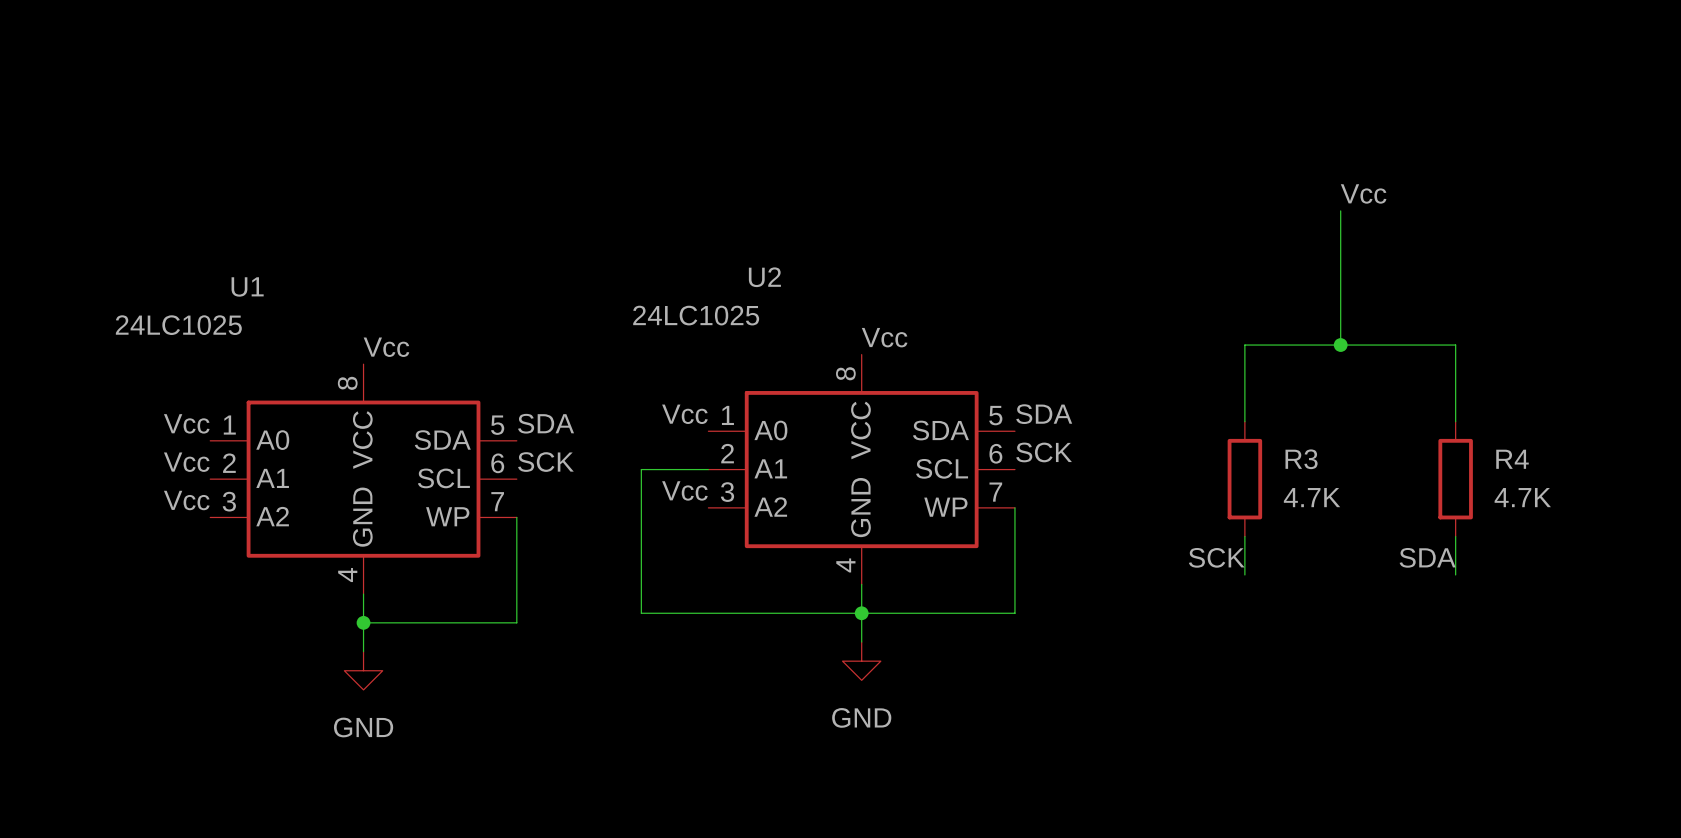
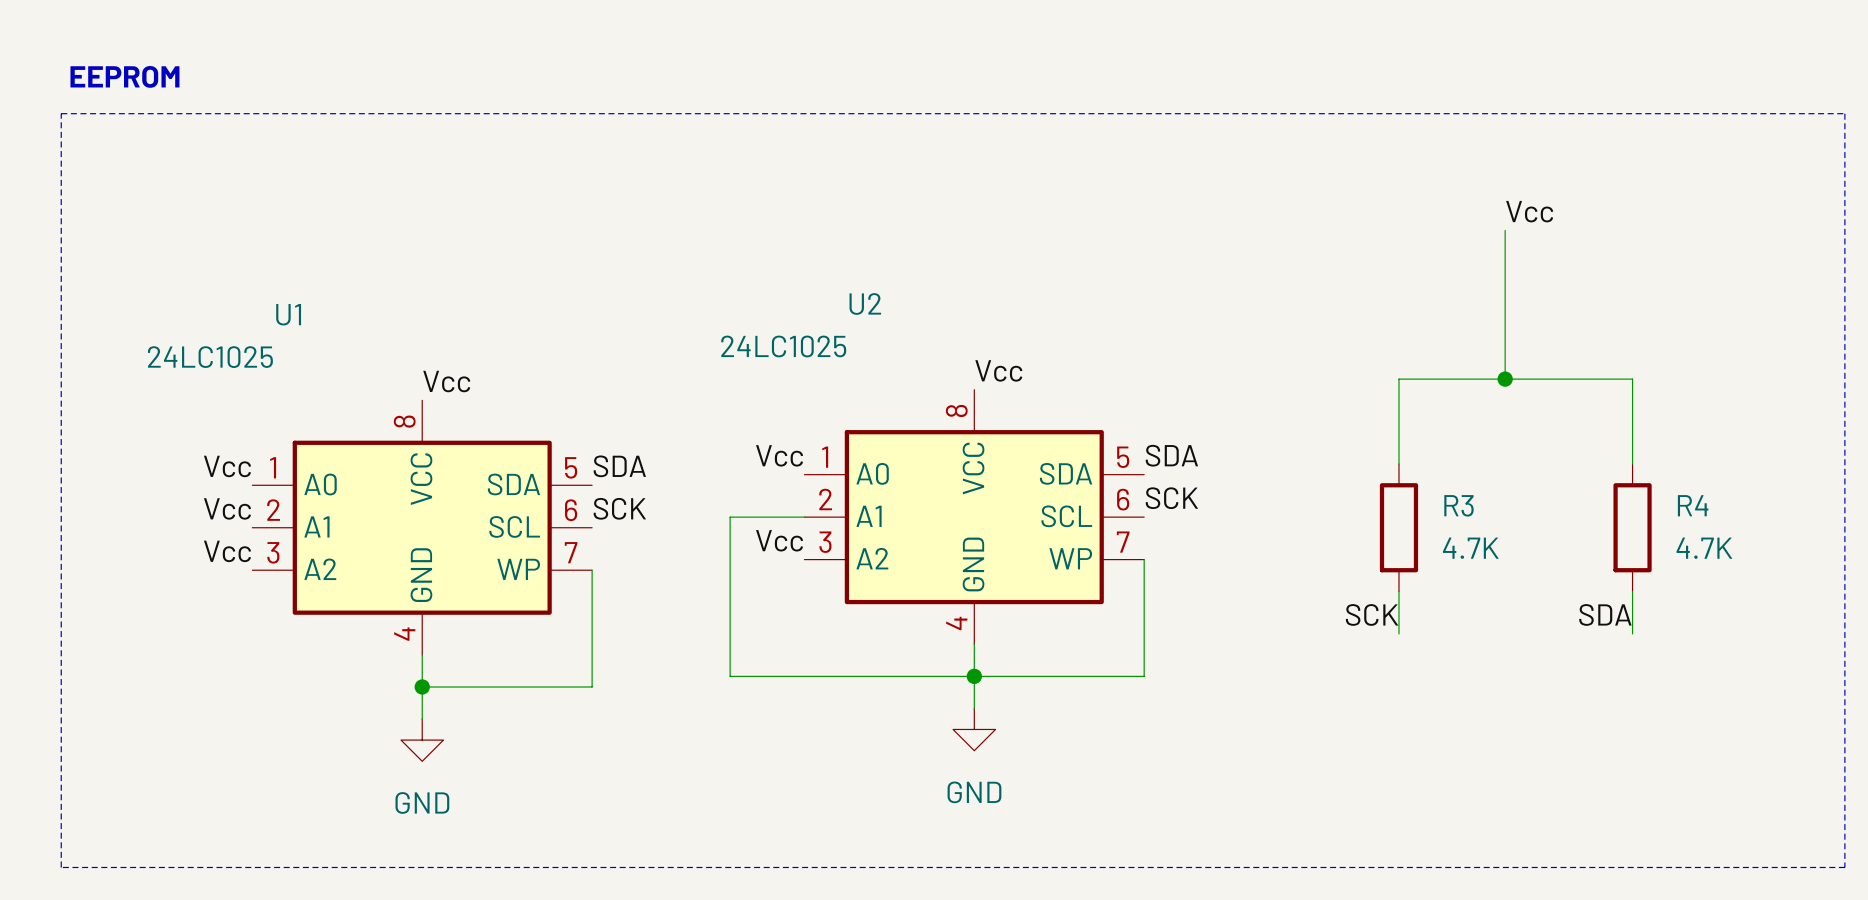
text: none -> EEPROM (124, 76)
line: none -> (61, 113) (1844, 113) (1844, 867) (61, 867) (61, 113)

